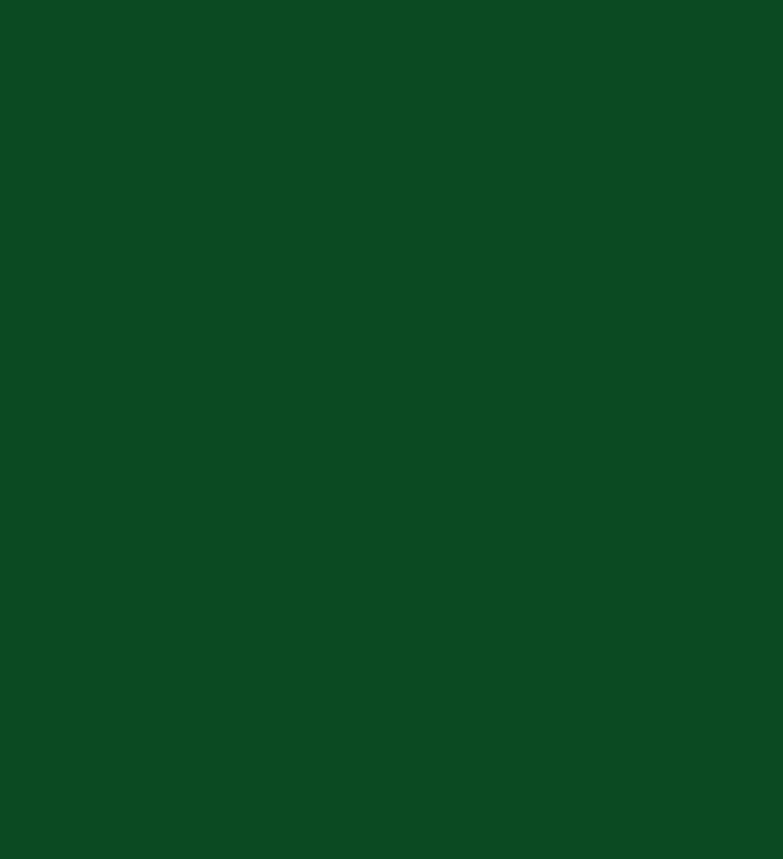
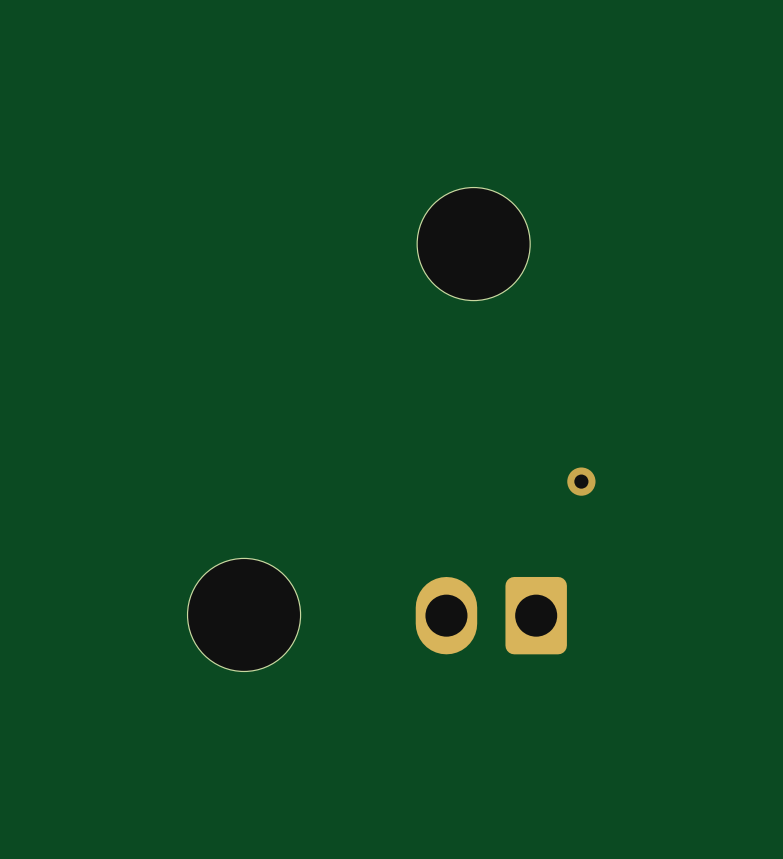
part: none -> (473, 244)
via: none -> (581, 481)
part: none -> (244, 614)
part: none -> (491, 615)

